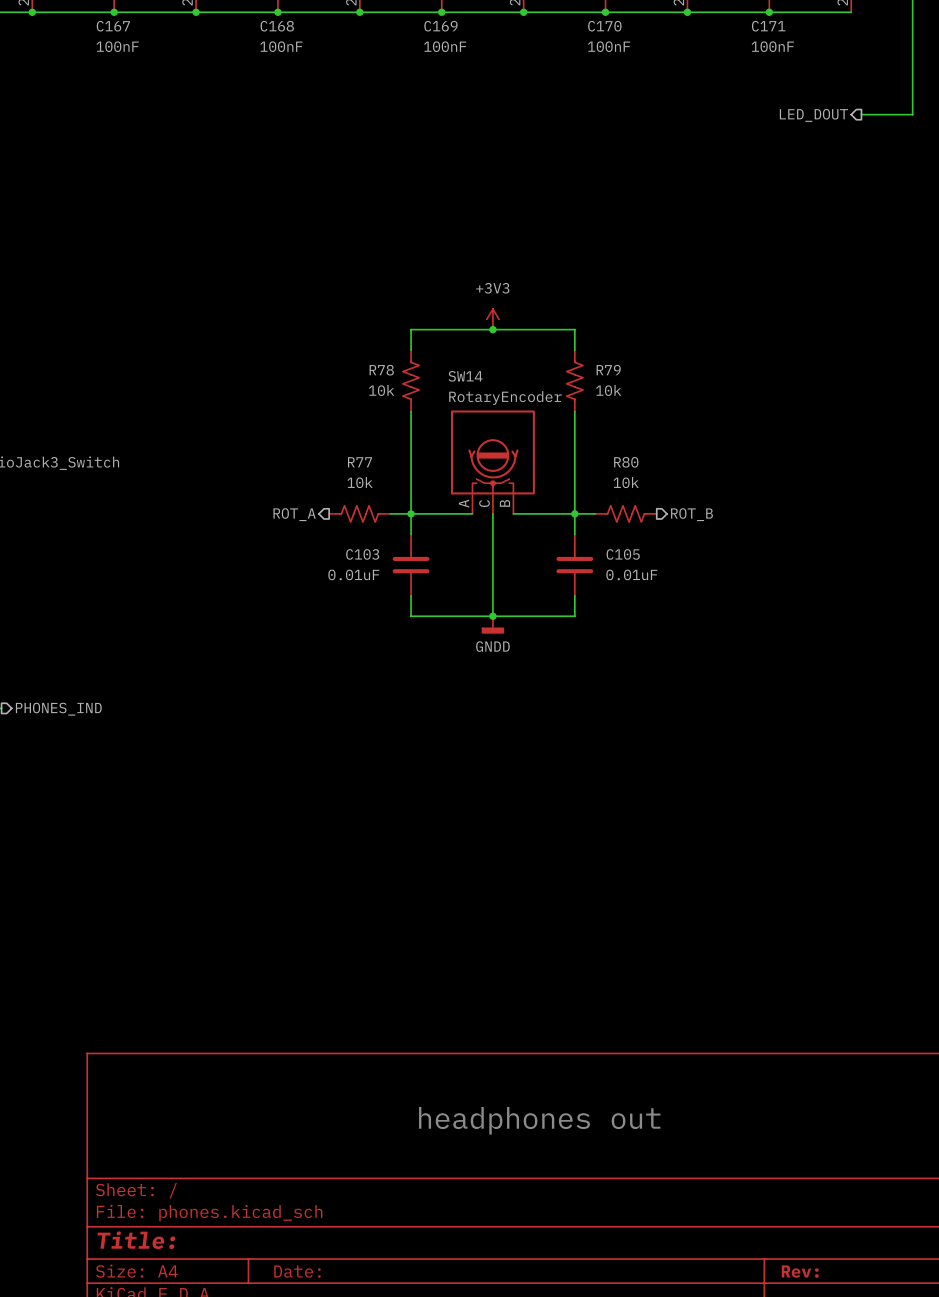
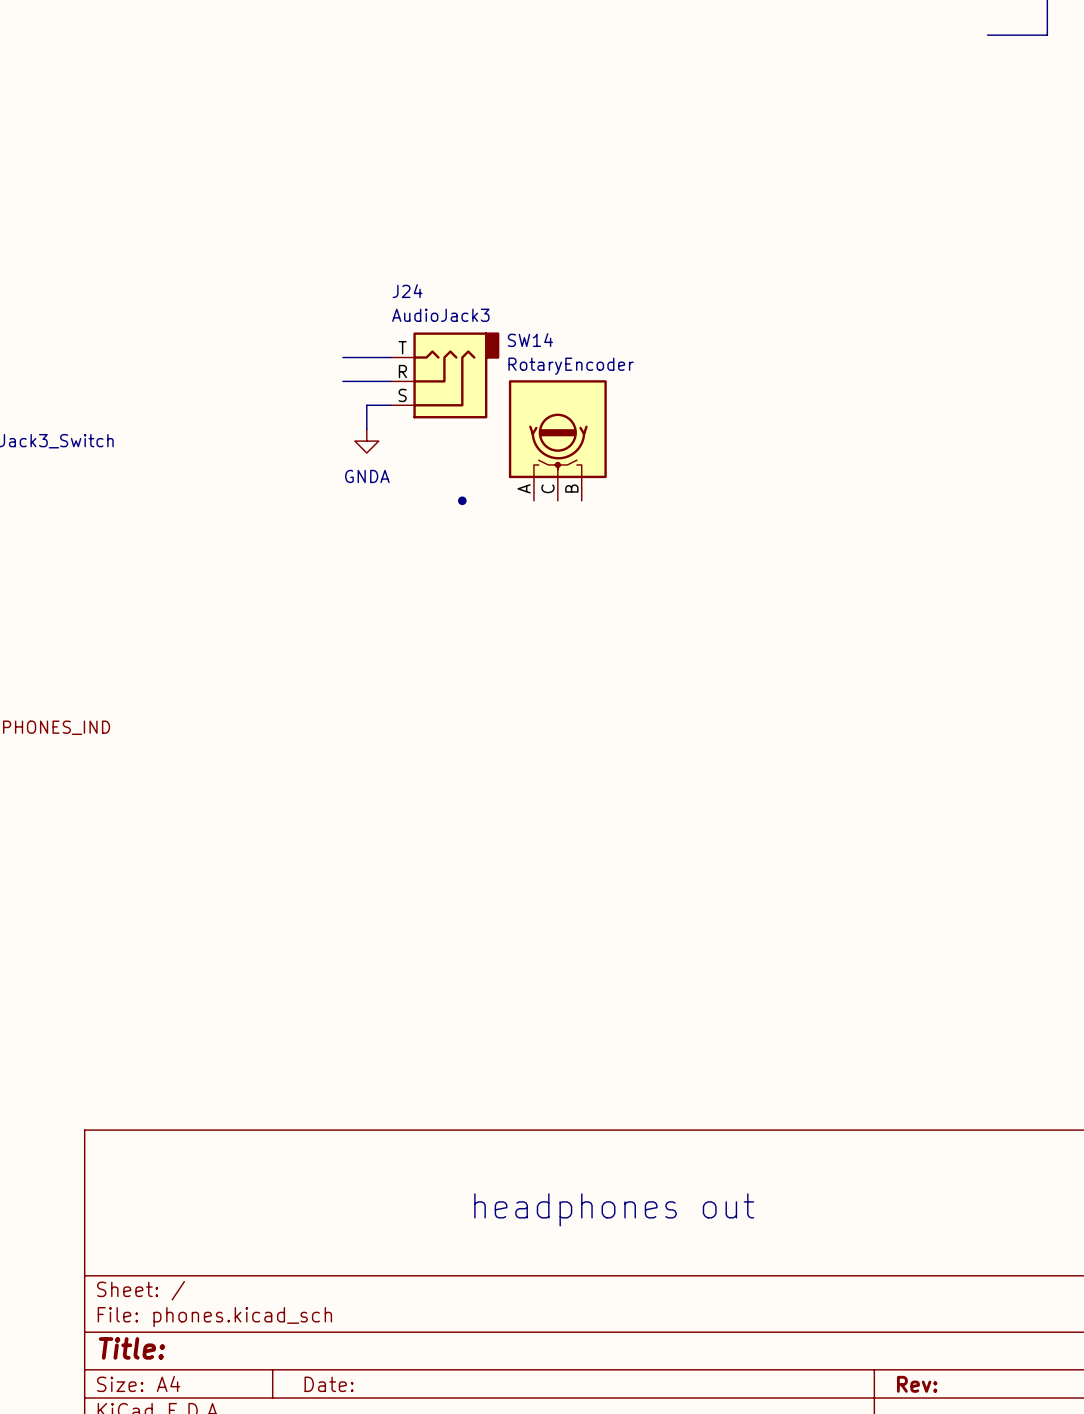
hierarchical label: LED_DOUT (813, 115) -> none
power symbol: +3V3 (492, 319) -> none
junction: (492, 329) -> none
wire: (411, 350) (411, 329) (574, 329) (574, 350) -> none
R78: 10k (411, 380) -> none
R79: 10k (574, 380) -> none
wire: none -> (342, 357) (390, 357)
J24: none -> AudioJack3 (445, 375)
wire: none -> (342, 381) (390, 381)
wire: (411, 411) (411, 534) -> none
wire: (574, 411) (574, 534) -> none
wire: none -> (390, 405) (366, 405) (366, 429)
power symbol: none -> GNDA (366, 441)
R77: 10k (359, 513) -> none
wire: (390, 513) (472, 513) -> none
wire: (492, 513) (492, 616) -> none
wire: (513, 513) (595, 513) -> none
junction: (574, 513) -> none
R80: 10k (626, 513) -> none
hierarchical label: ROT_A (294, 514) -> none
hierarchical label: ROT_B (691, 514) -> none
C103: 0.01uF (411, 565) -> none
C105: 0.01uF (574, 565) -> none
wire: (411, 595) (411, 616) (574, 616) (574, 595) -> none
junction: (492, 616) -> none
power symbol: GNDD (492, 624) -> none

